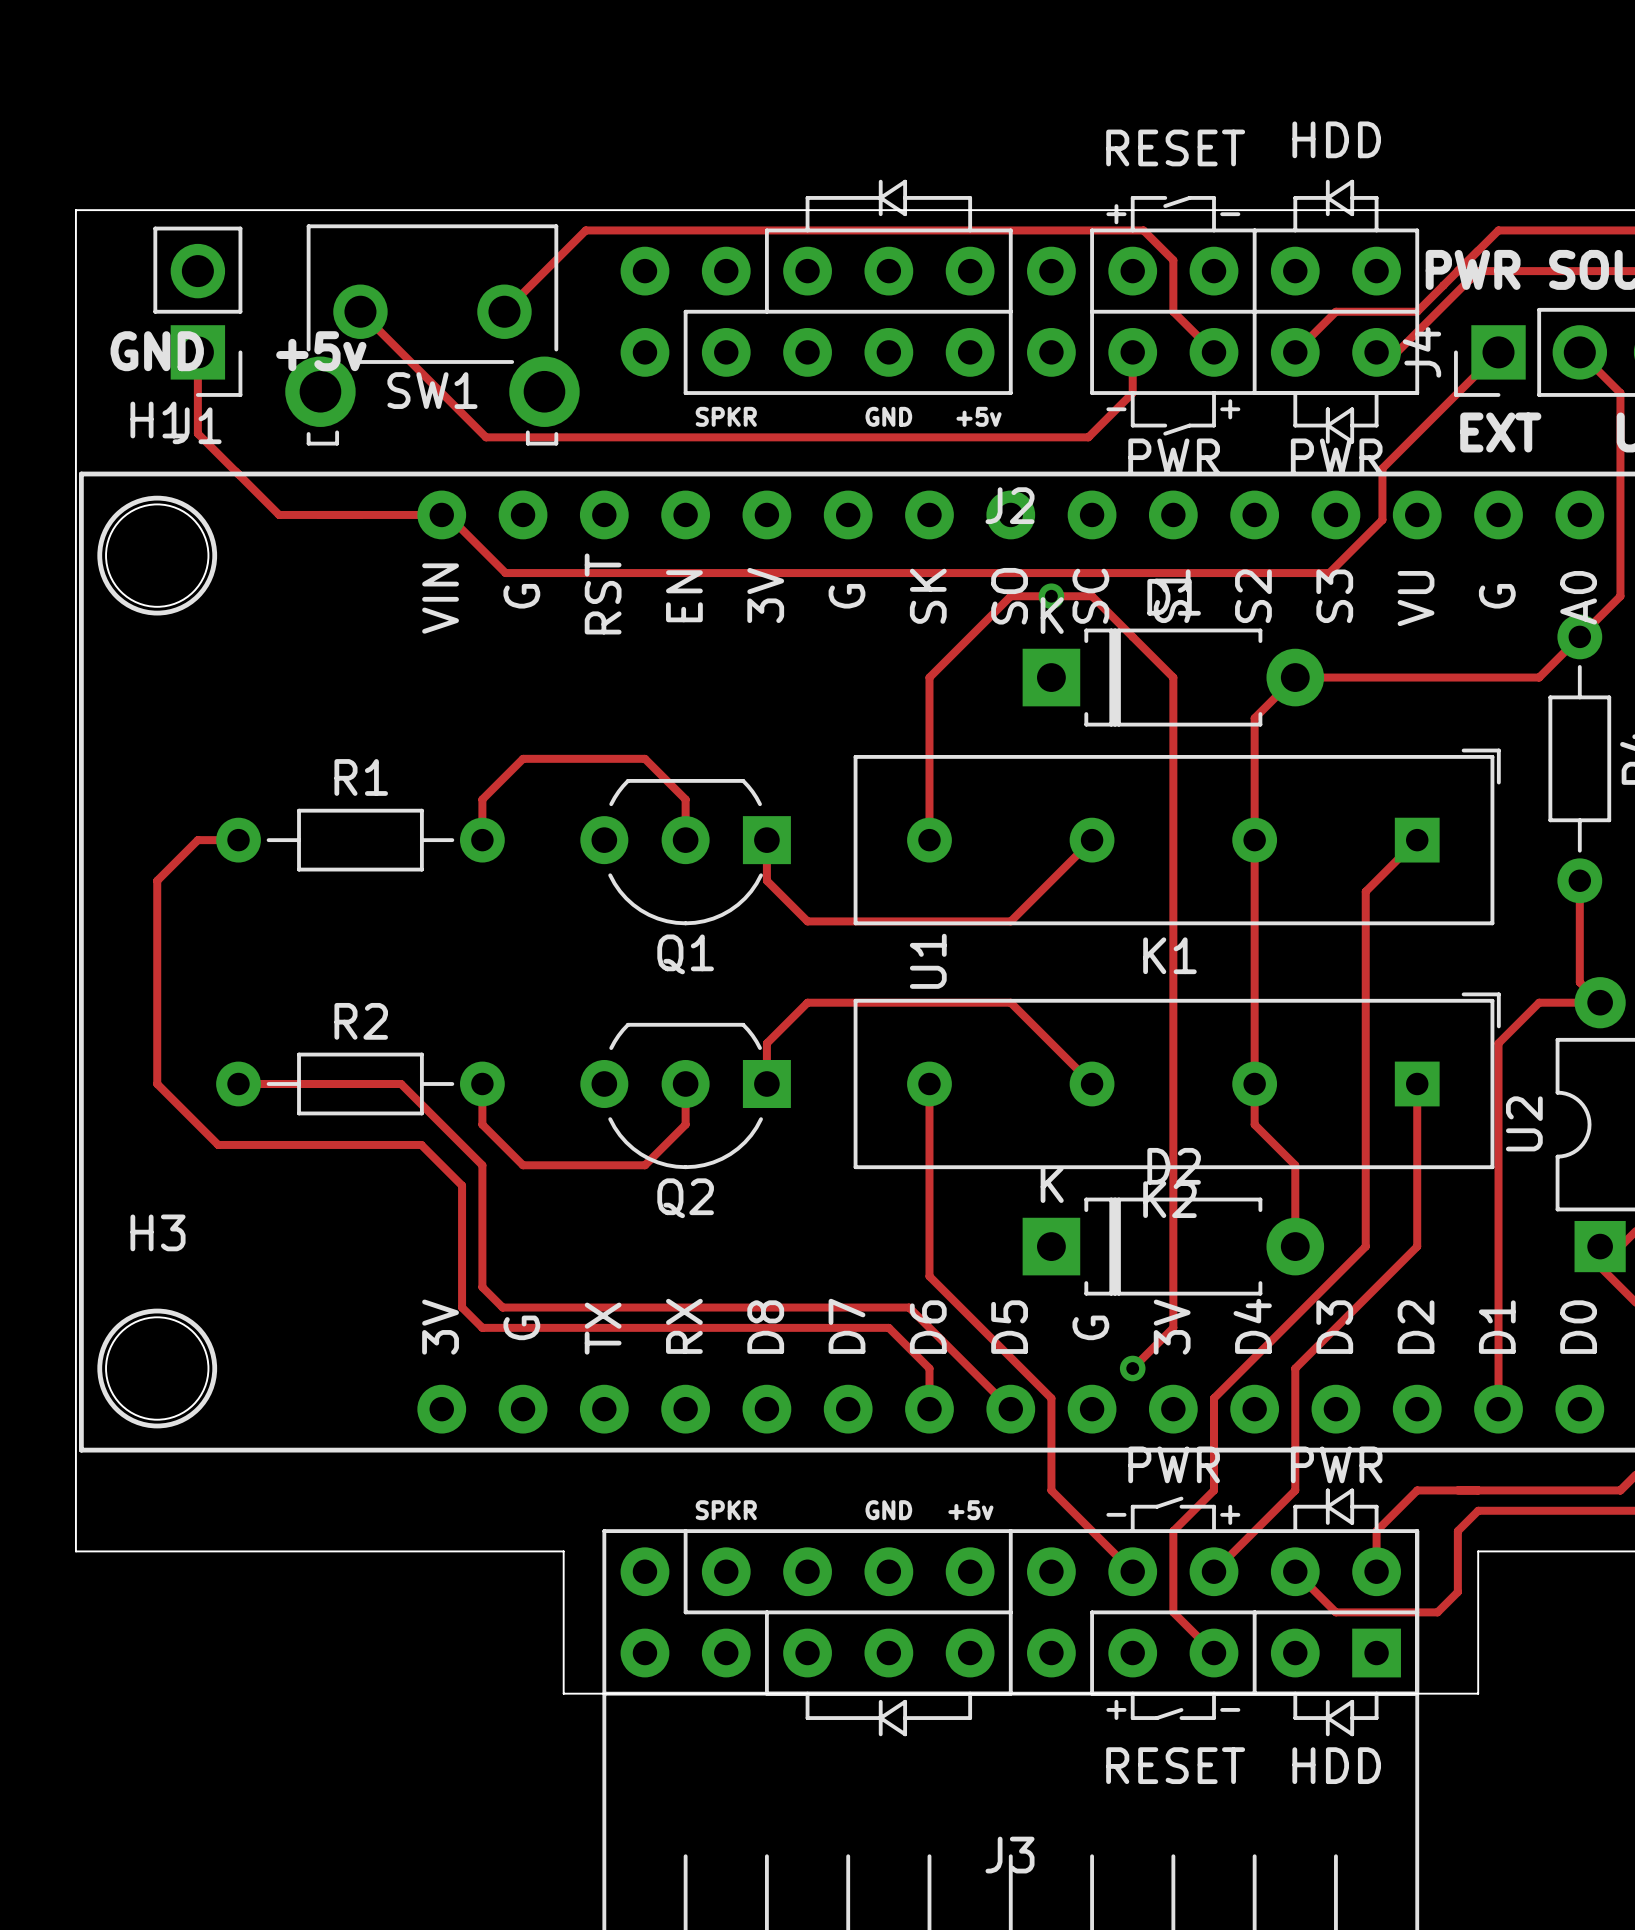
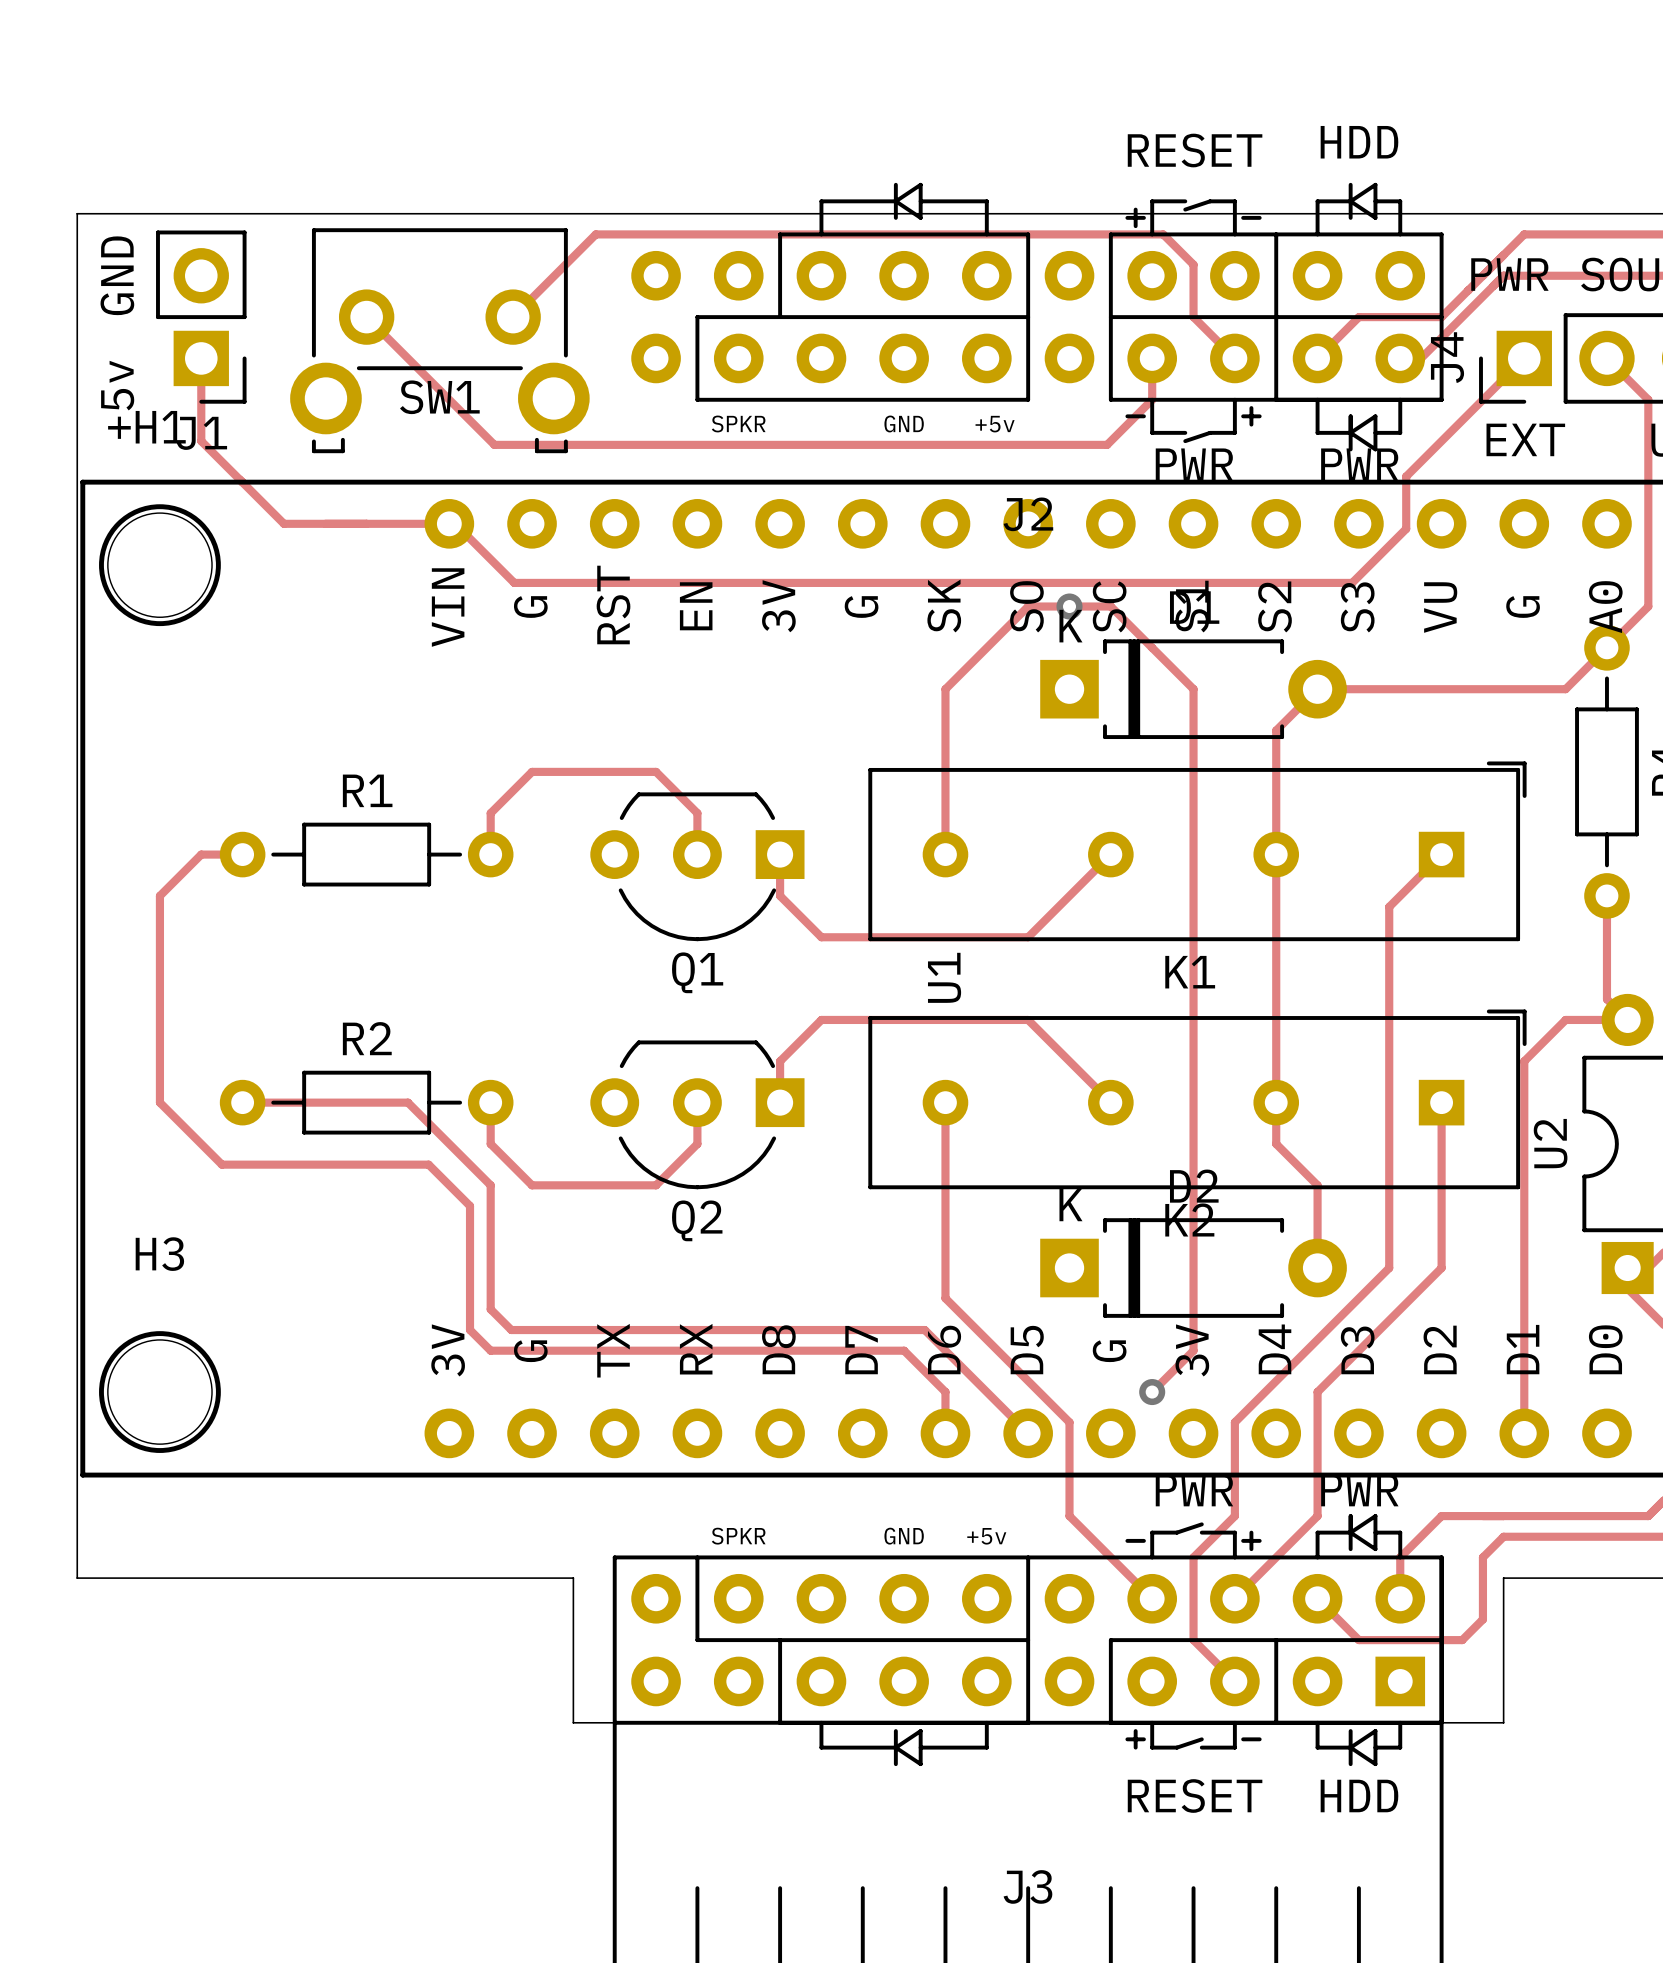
text rotation: 0° (157, 351) -> 90° counterclockwise (117, 275)
text rotation: 0° (321, 351) -> 90° counterclockwise (117, 399)
text position: +5v (321, 351) -> +5v (117, 399)

